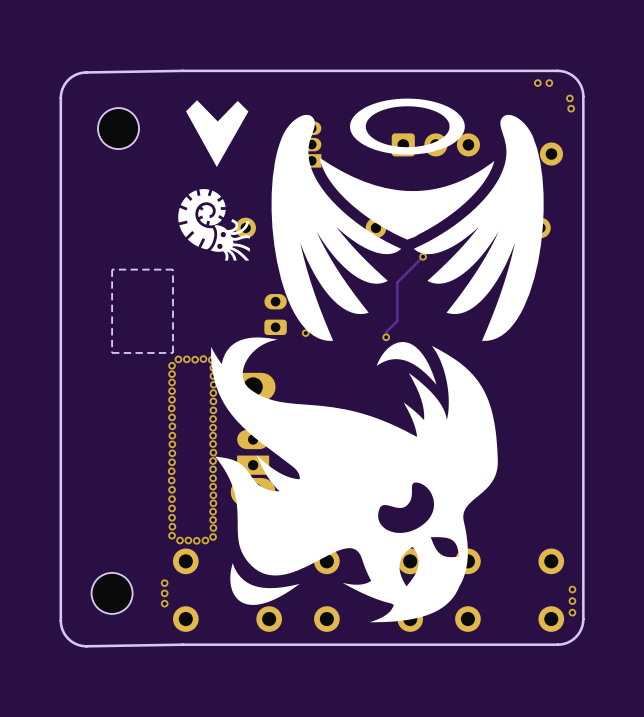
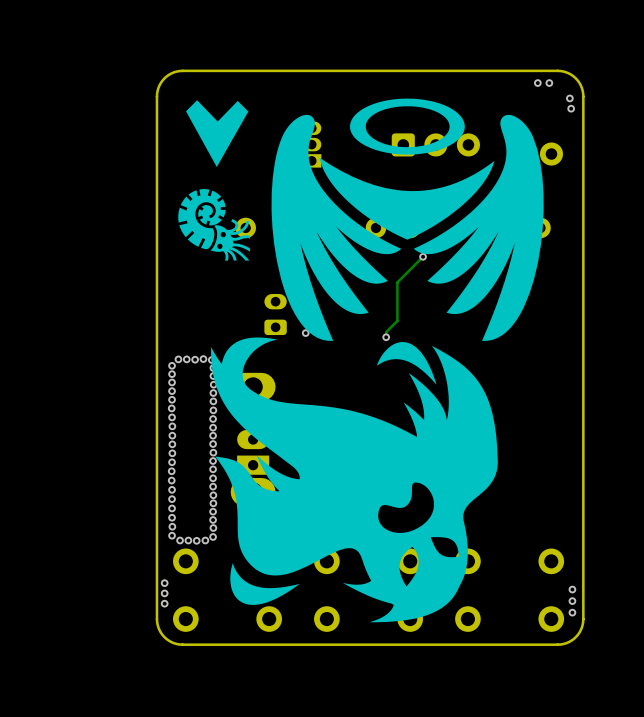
board edge: (182, 70) (80, 73) (66, 82) (60, 98) (61, 626) (70, 640) (83, 646) (182, 644) -> (182, 70) (174, 72) (164, 78) (158, 88) (156, 96) (156, 619) (159, 630) (164, 637) (171, 642) (182, 644)
part: (118, 128) -> none
board edge: (173, 269) (112, 269) (112, 352) (173, 352) (173, 269) -> none
part: (112, 593) -> none

